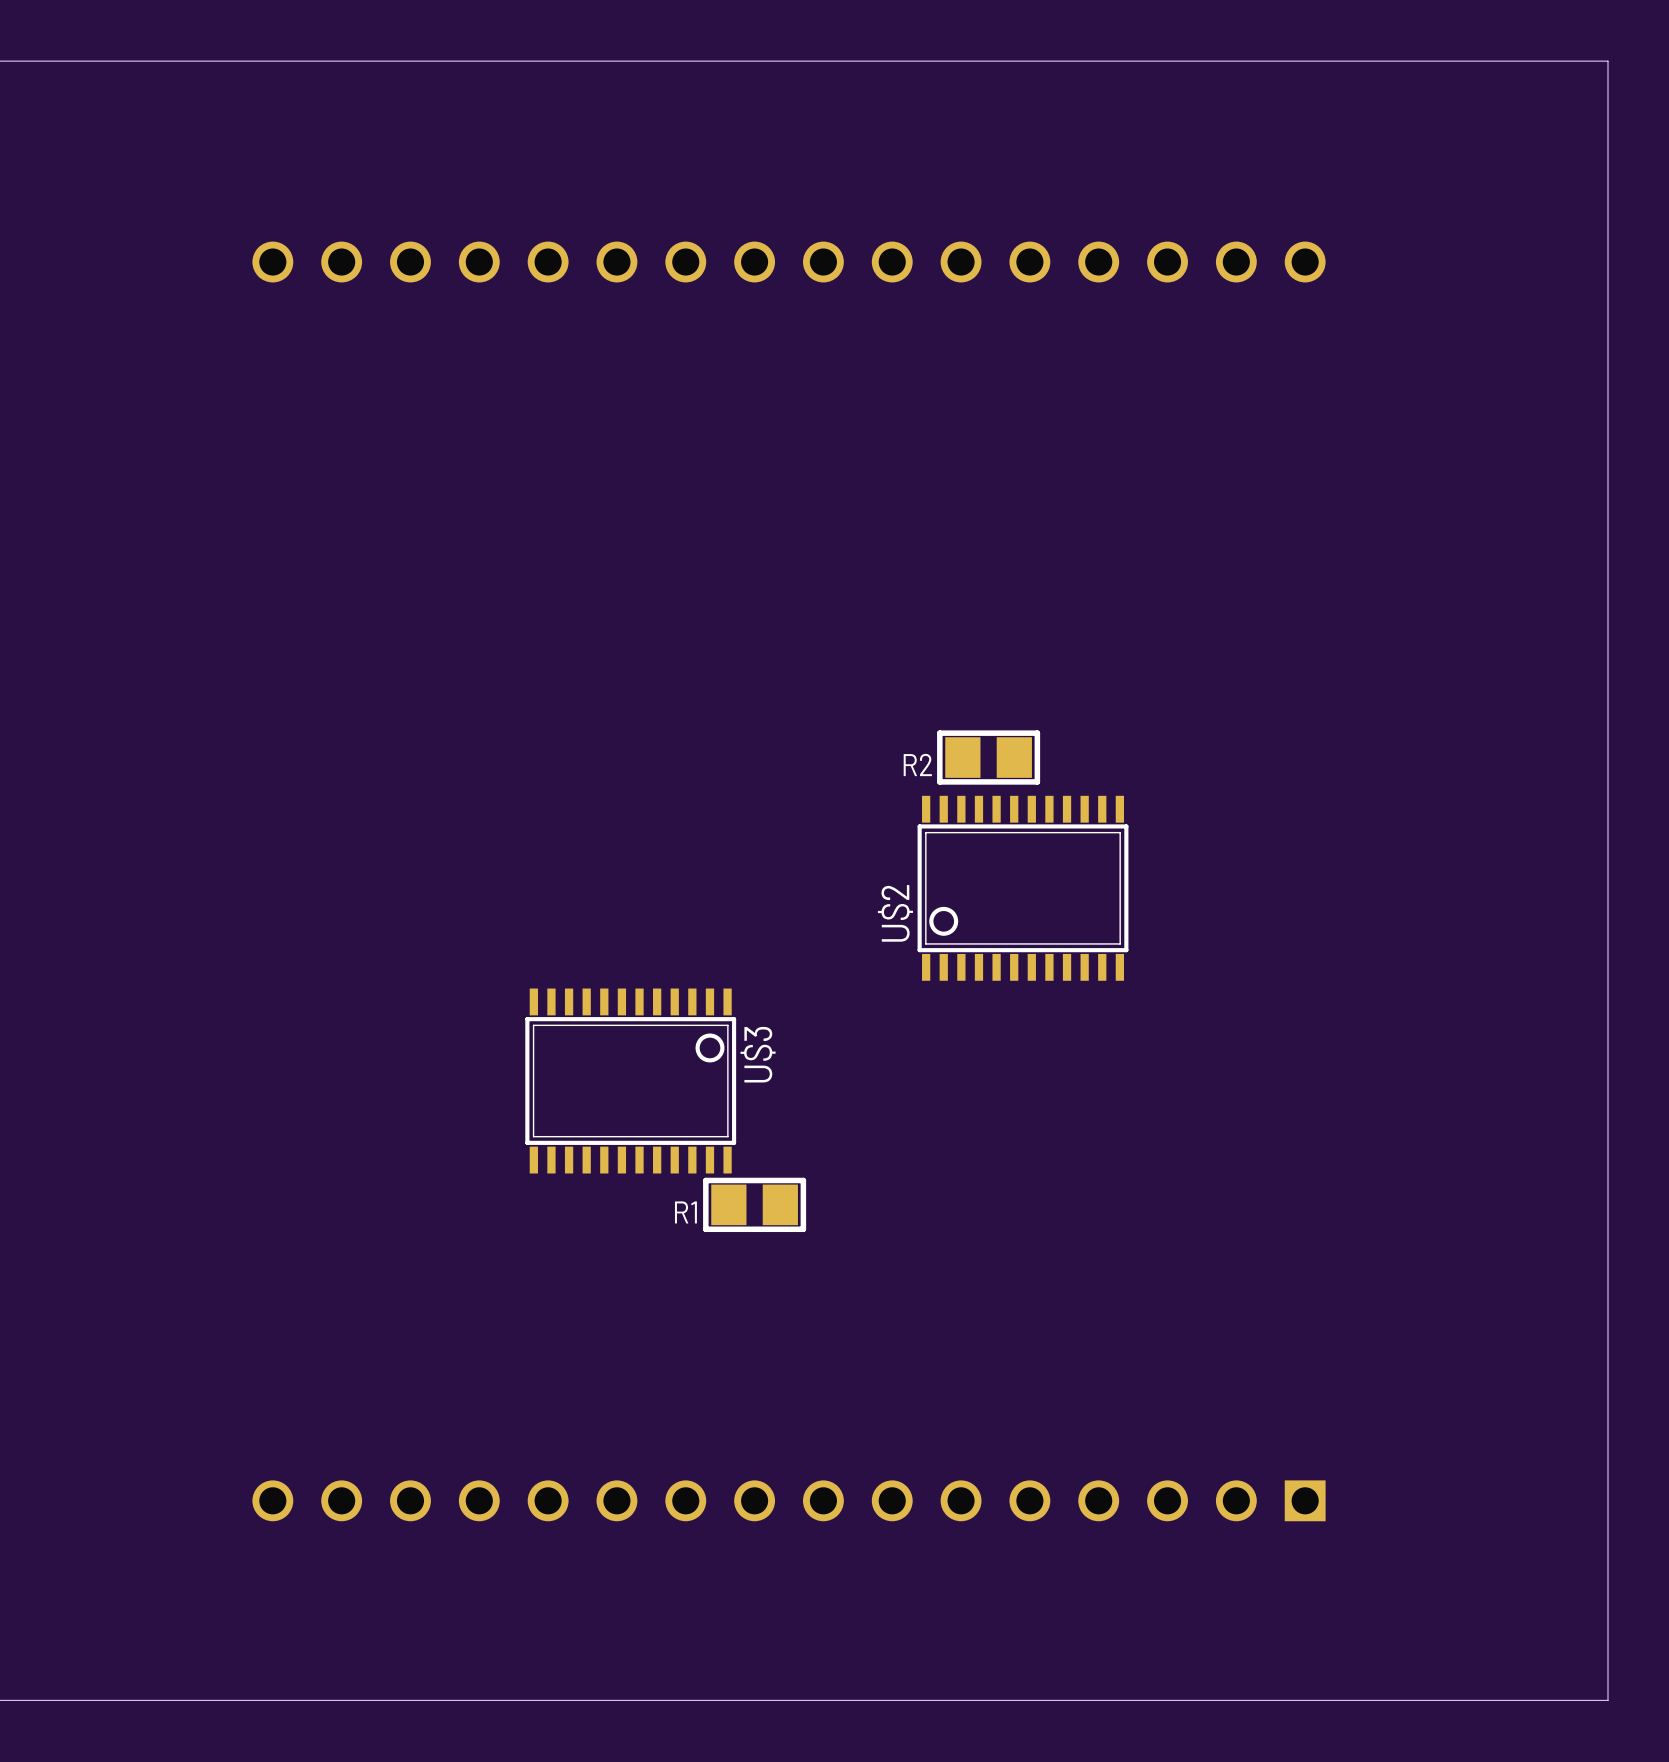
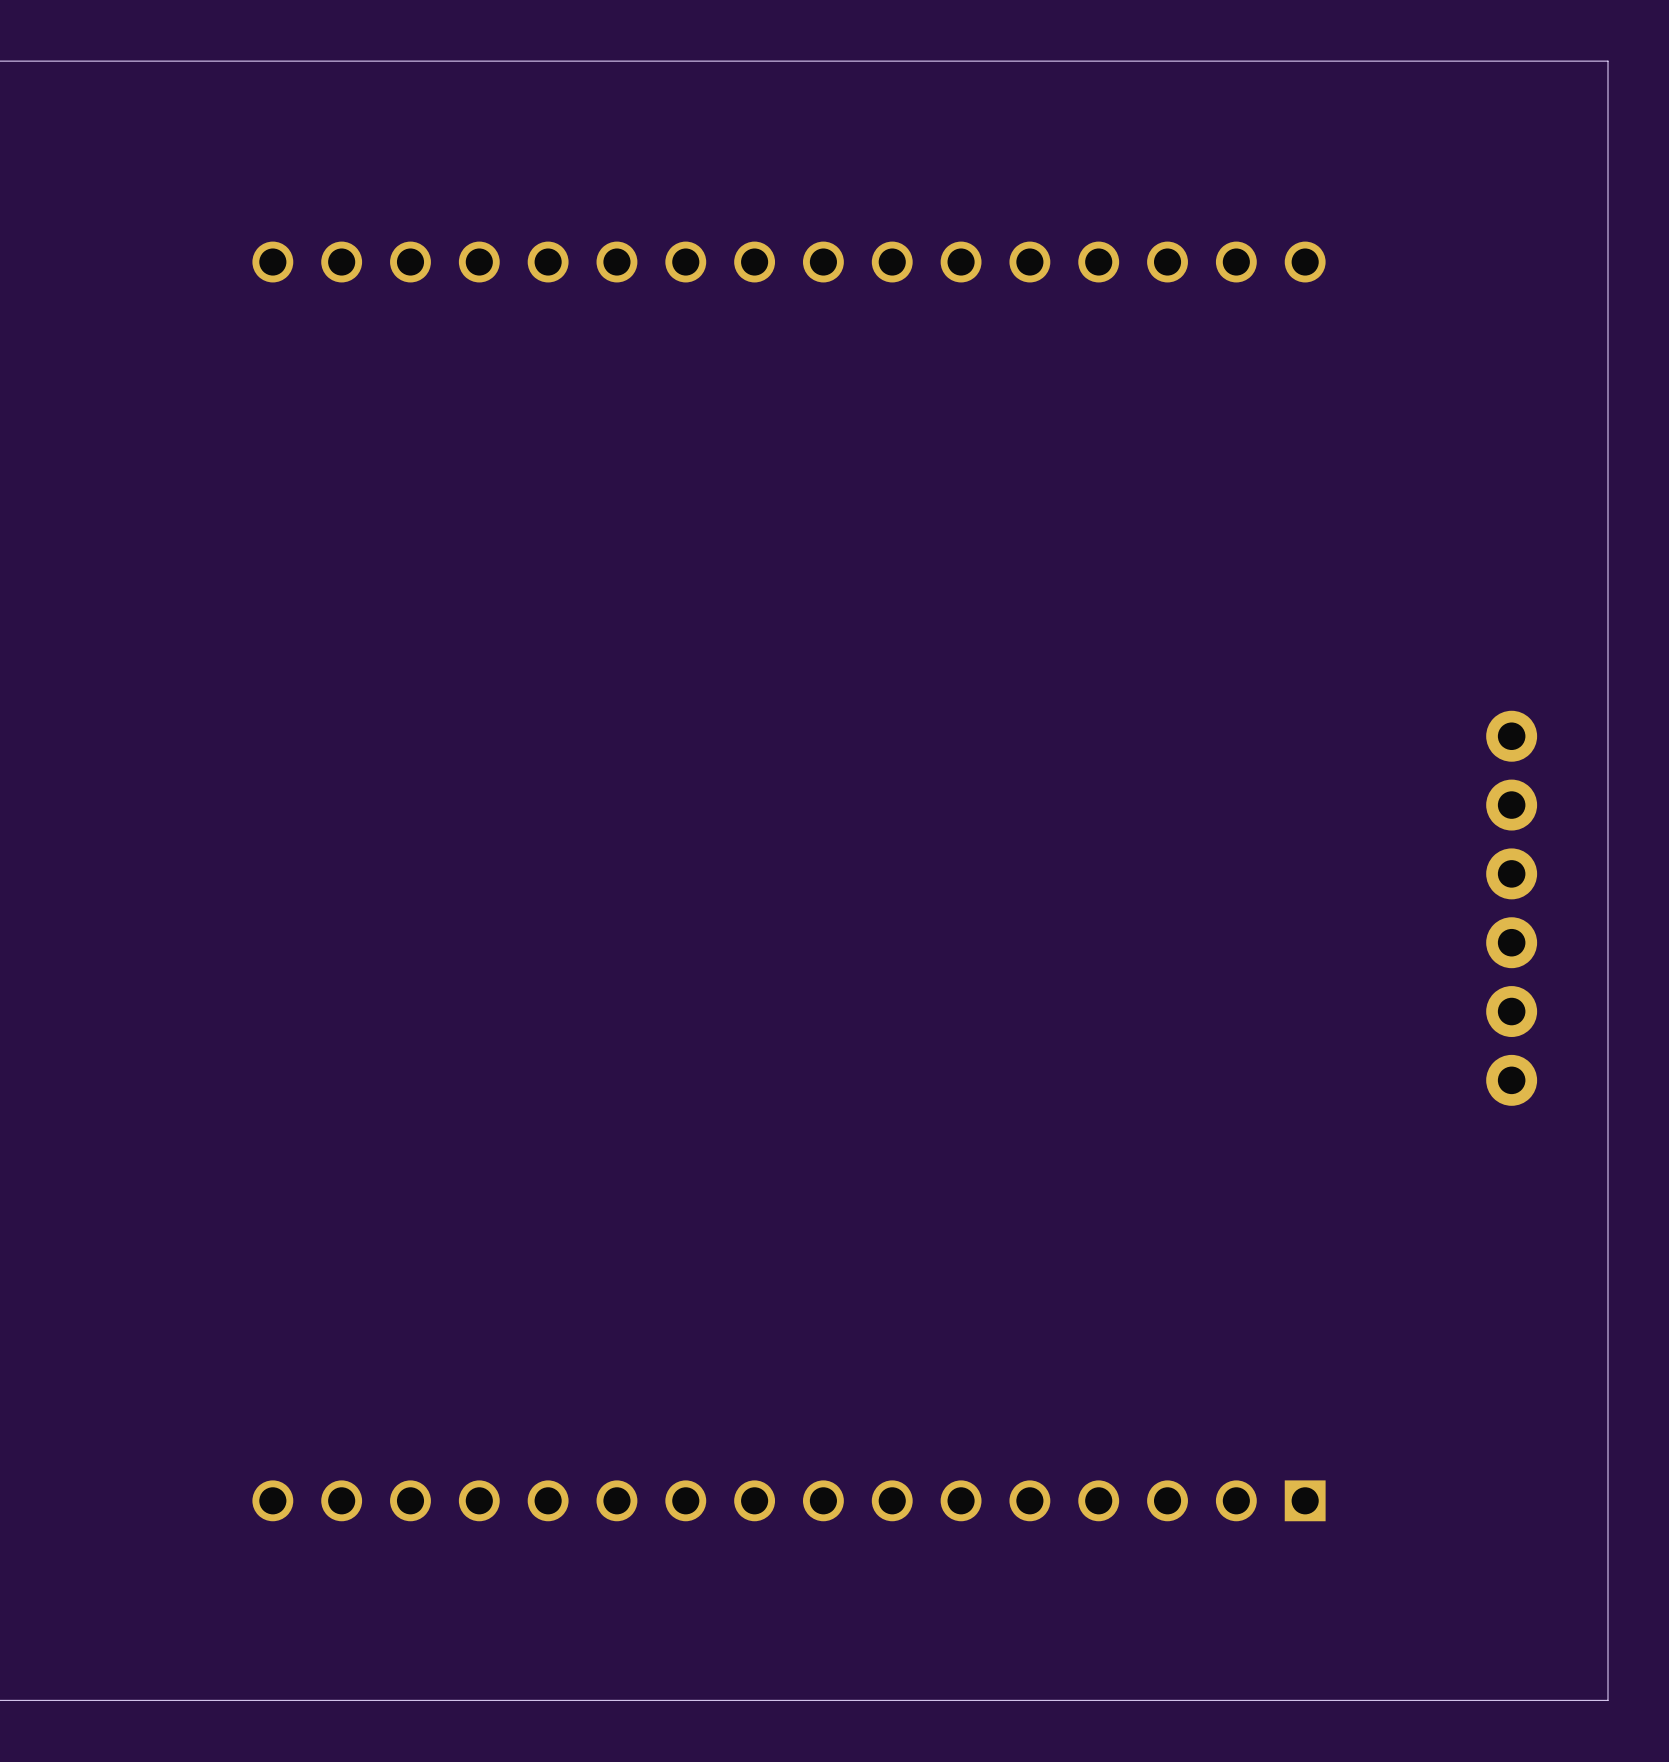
R2: (988, 757) -> none
U$2: (1023, 888) -> none
part: none -> (1511, 908)
U$3: (630, 1081) -> none
R1: (754, 1204) -> none

